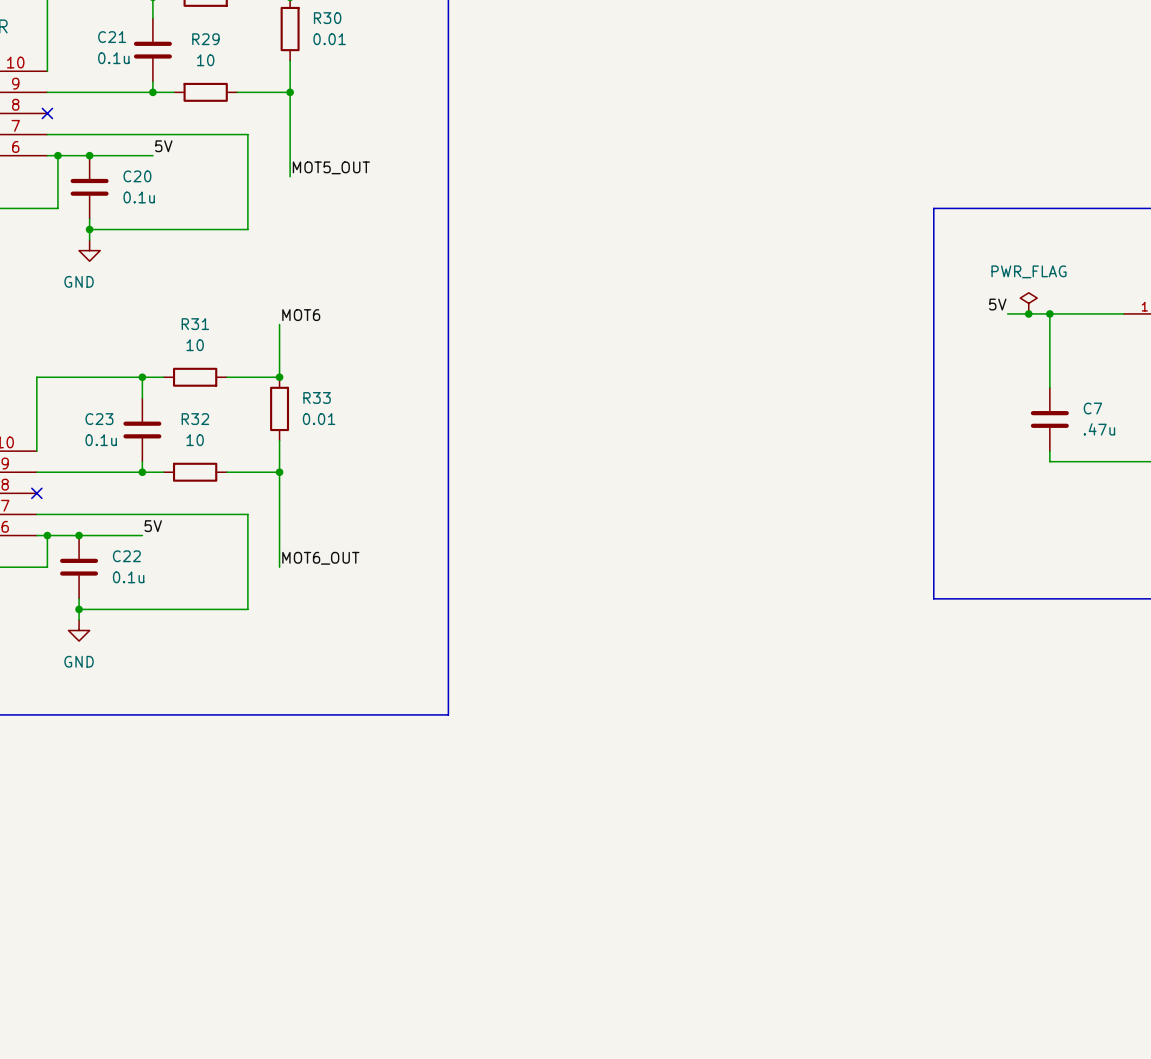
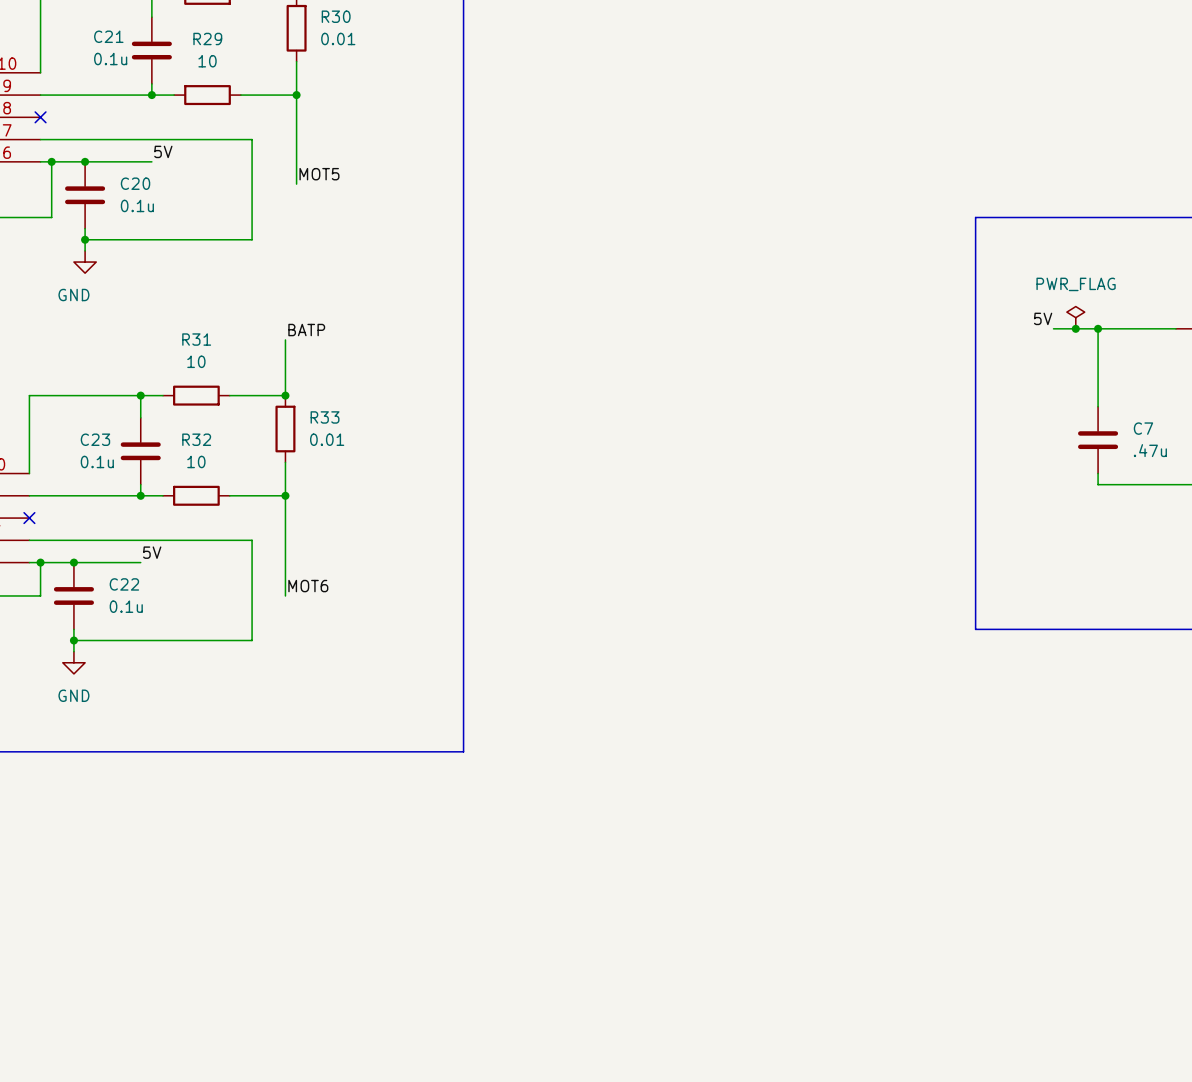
label: MOT5_OUT (331, 167) -> MOT5 (319, 174)
label: MOT6 (301, 315) -> BATP (306, 330)
label: MOT6_OUT (320, 558) -> MOT6 (308, 586)

